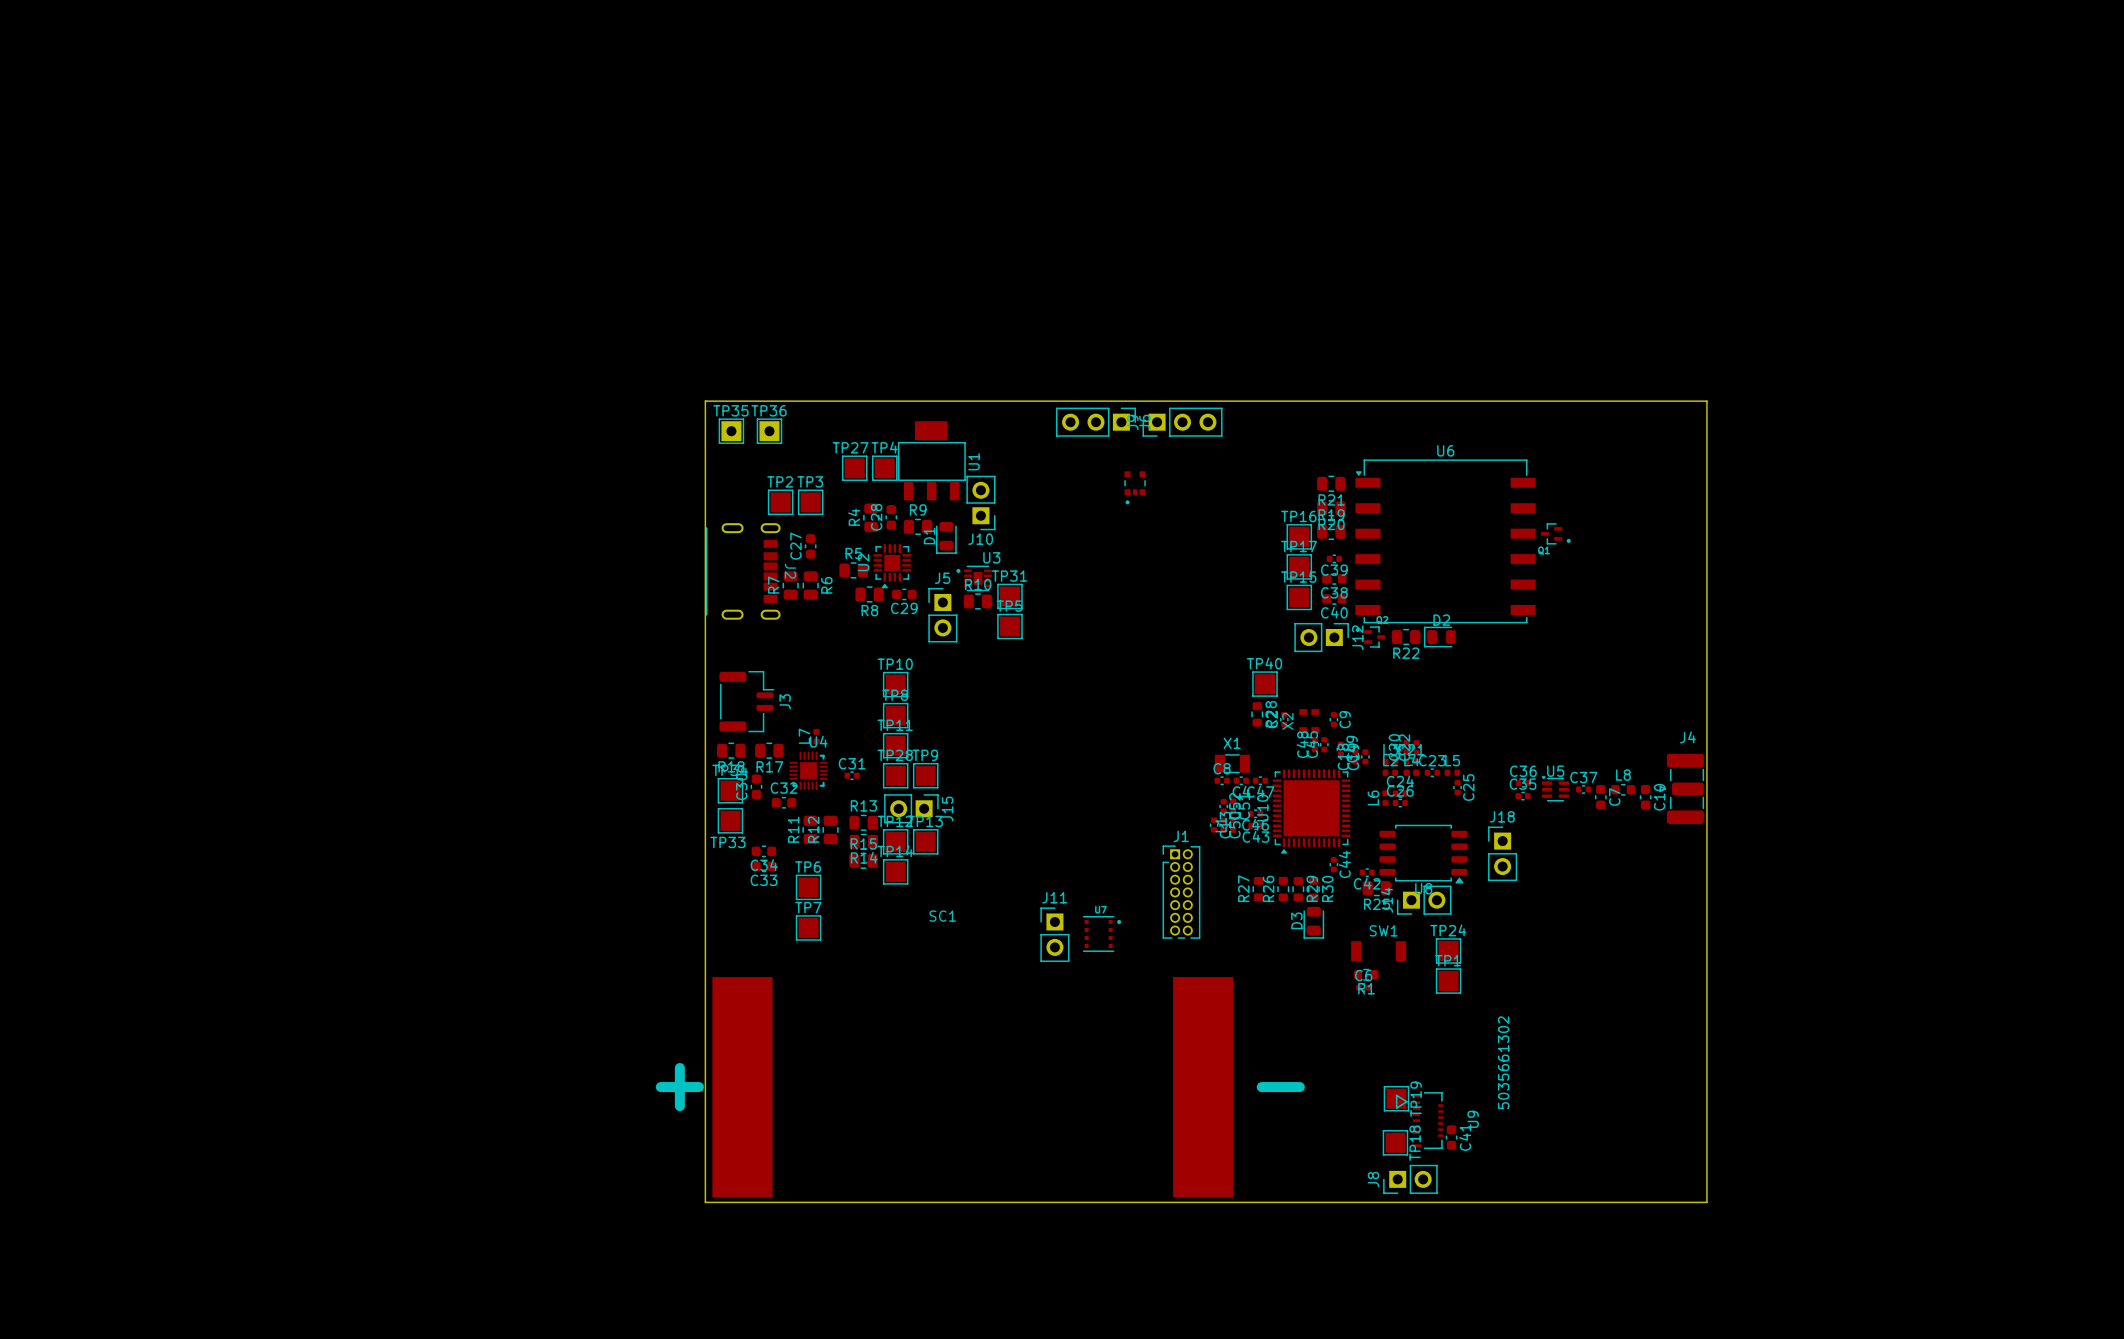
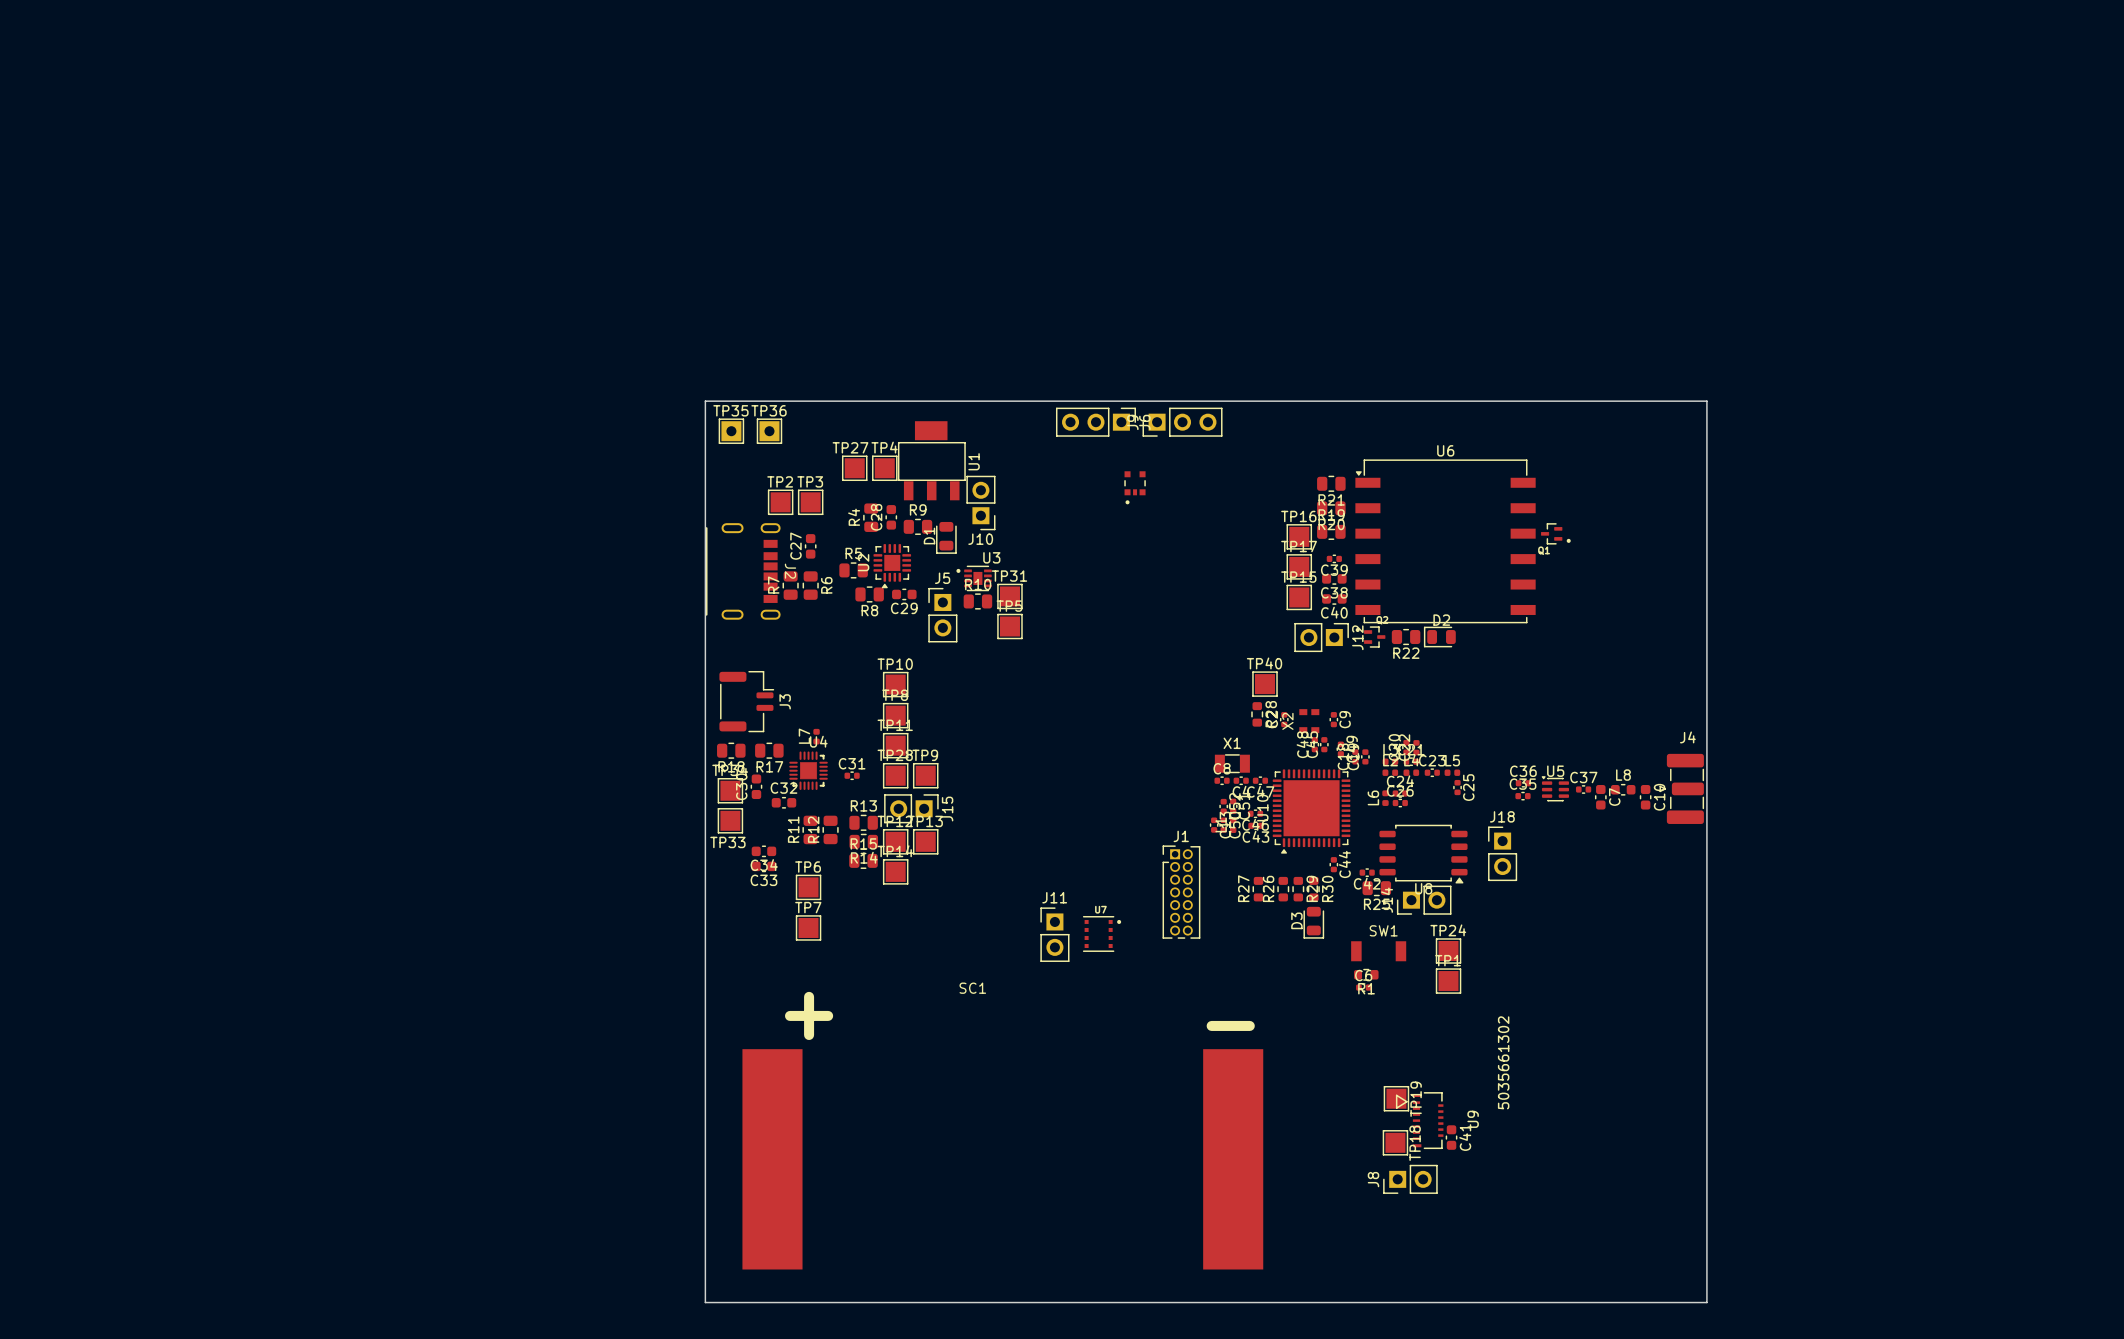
SC1 text position: + (679, 1087) -> + (809, 1015)
SC1 position: (972, 1087) -> (1002, 1159)
SC1 text position: - (1280, 1087) -> - (1230, 1025)
board edge: (705, 1202) (1706, 1202) -> (705, 1202) (705, 1302) (1706, 1302) (1706, 1202)

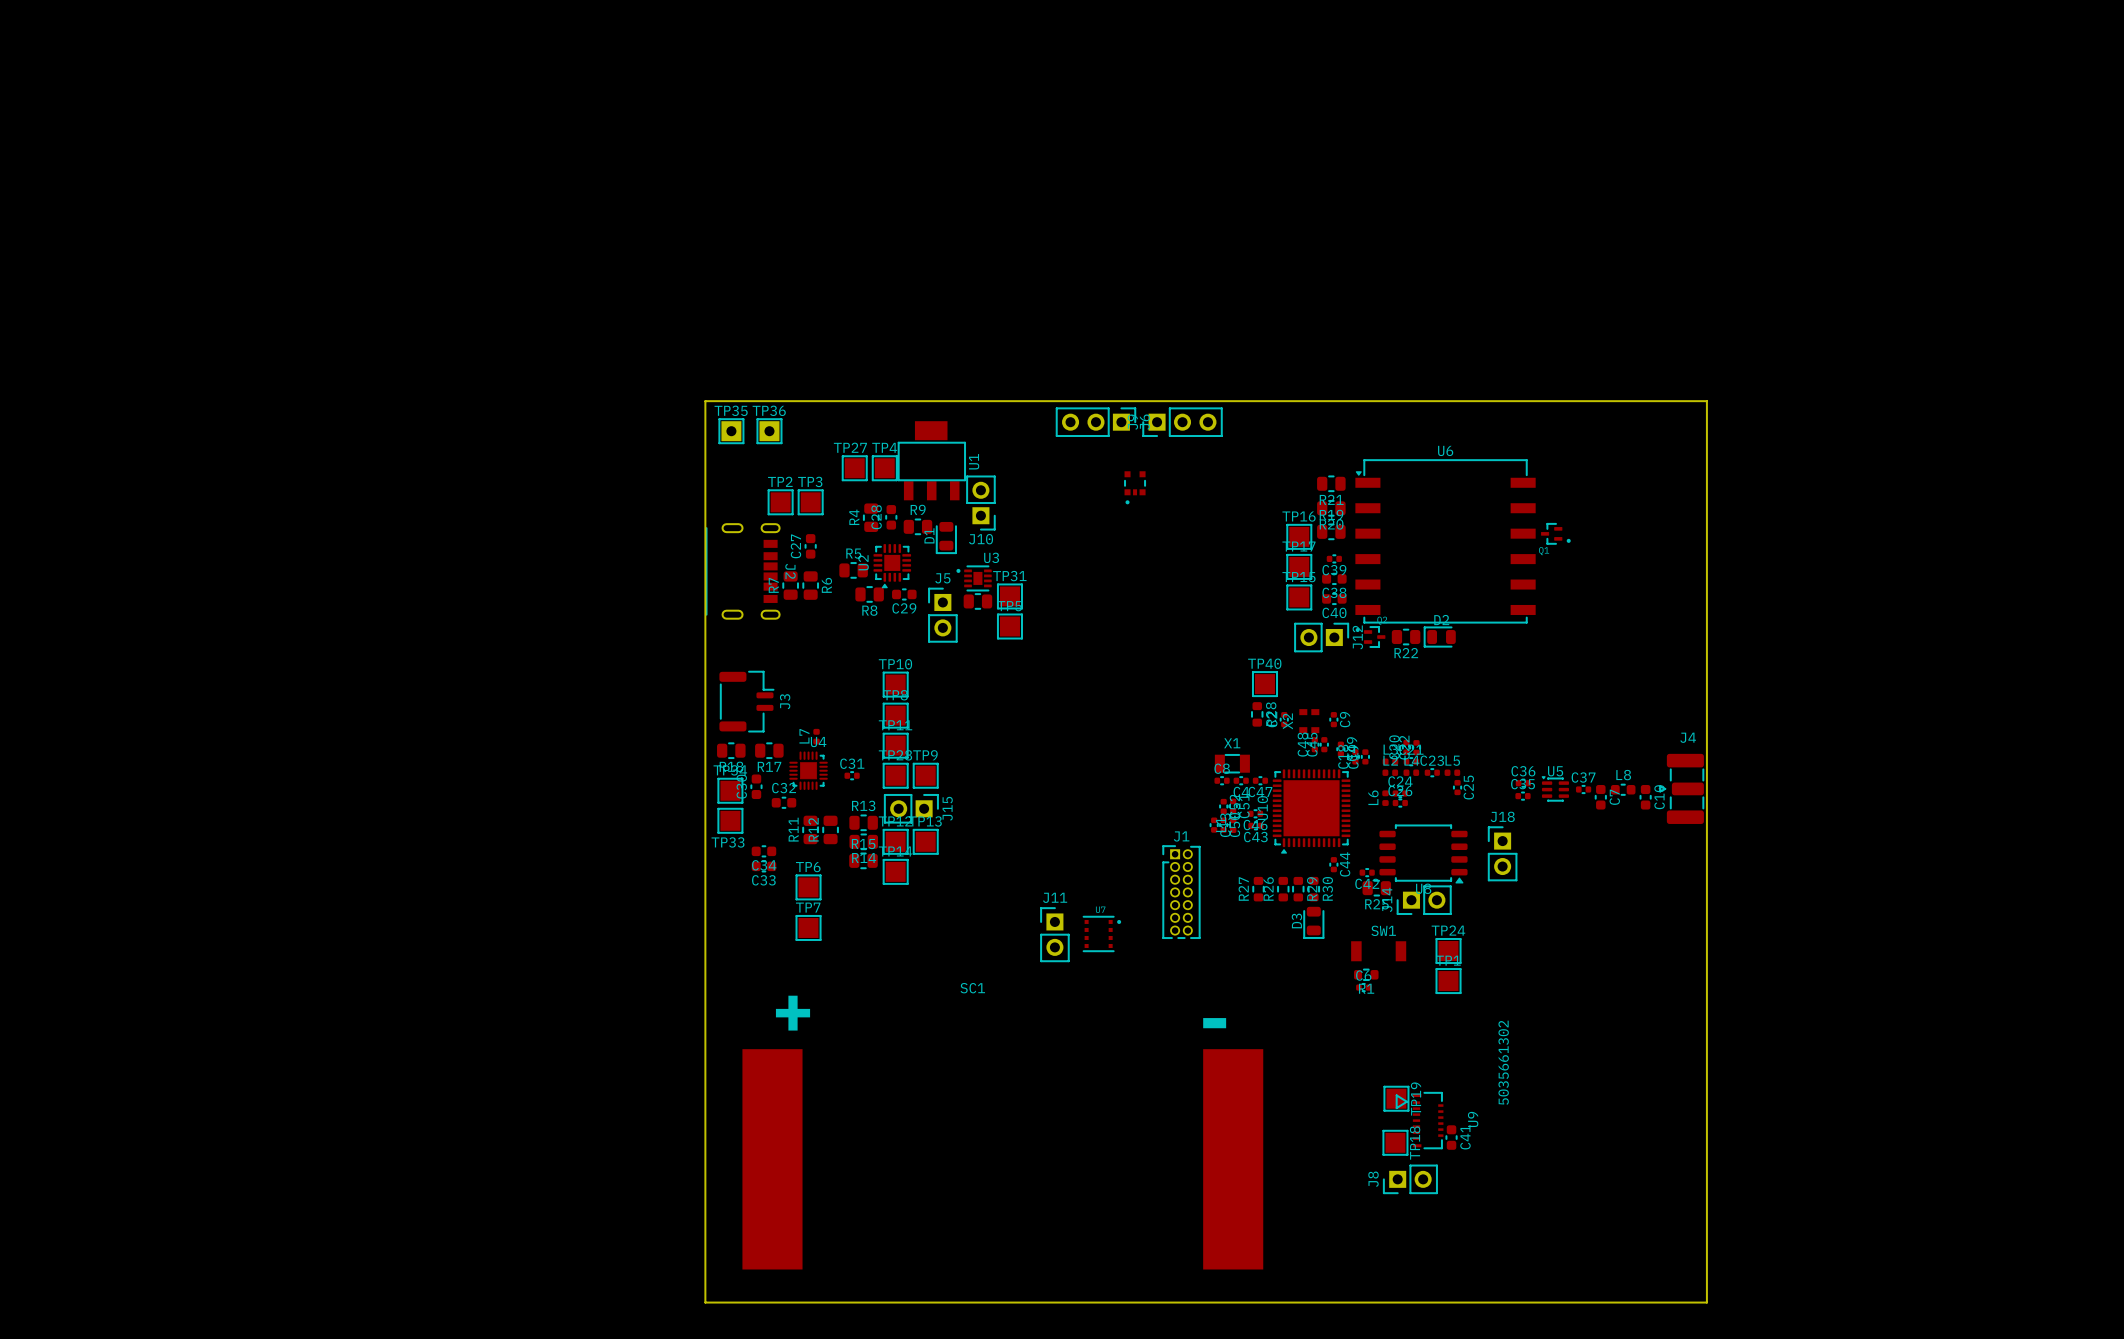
R10 name: R10 (978, 584) -> none

